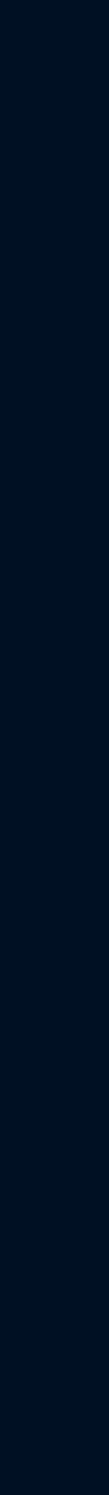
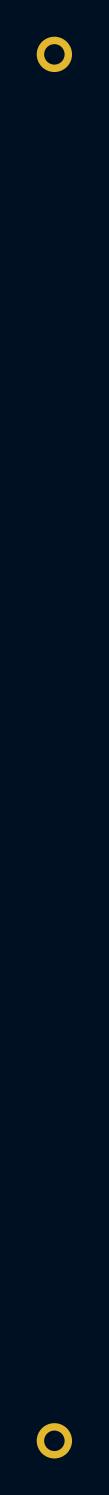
part: none -> (54, 54)
part: none -> (54, 1440)

